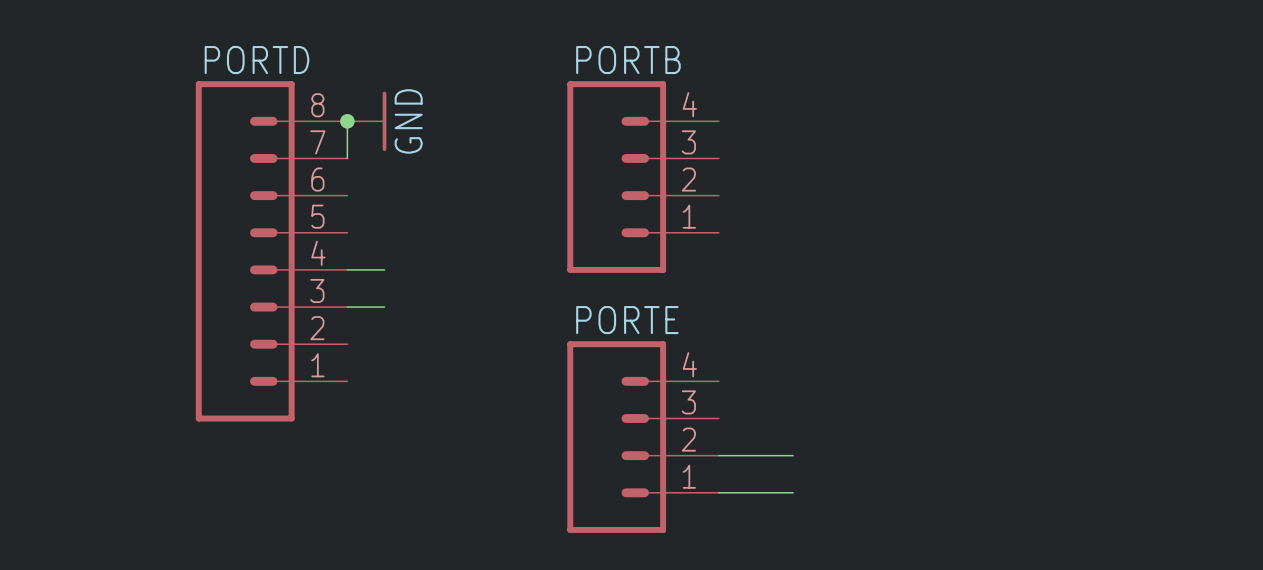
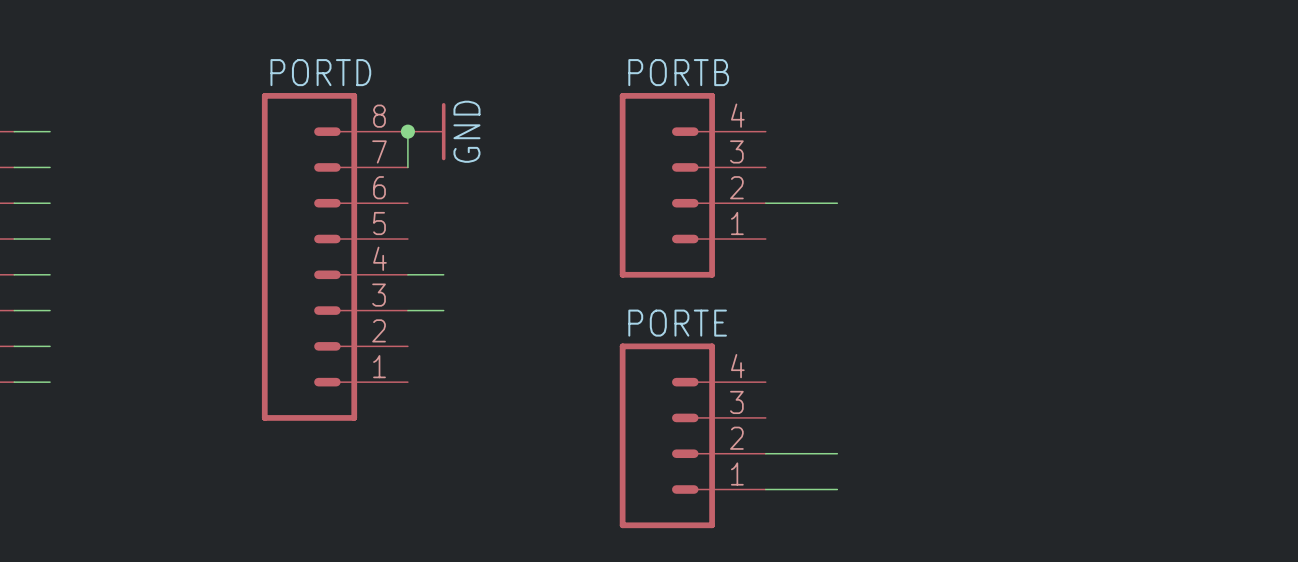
wire: none -> (765, 203) (837, 203)

